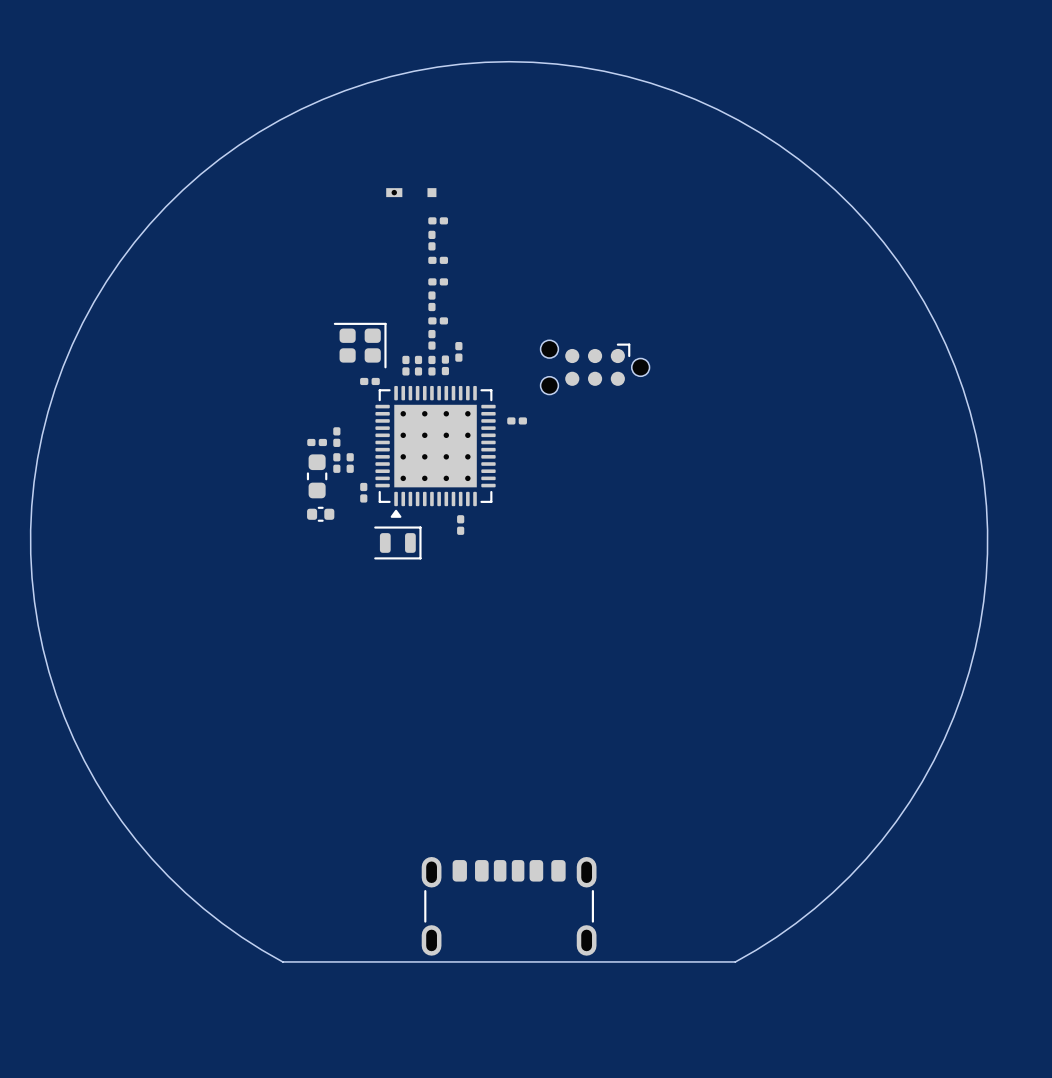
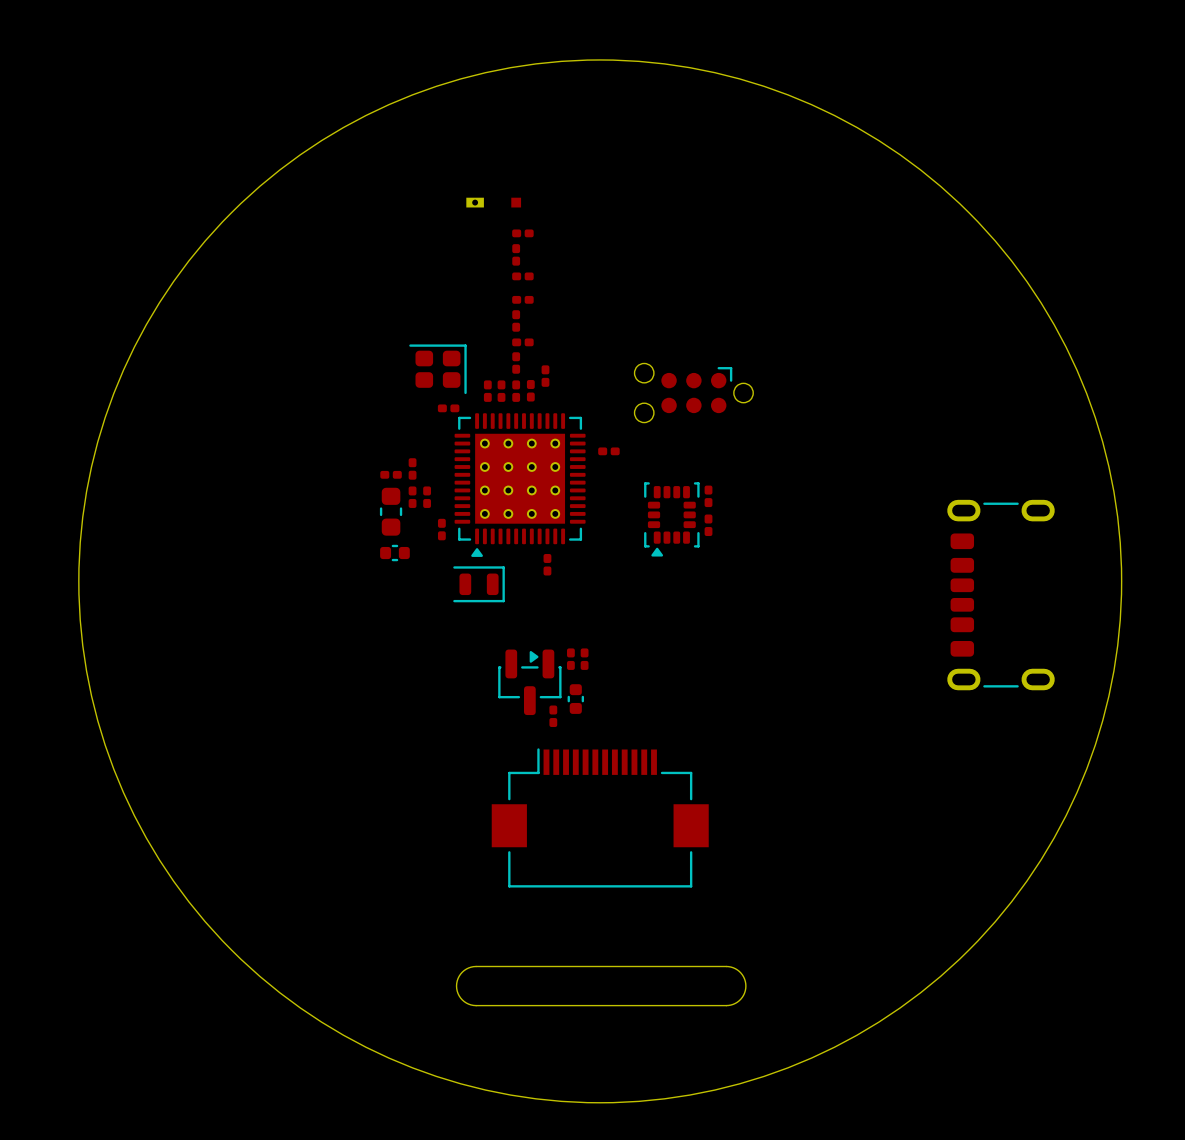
round board edge: none -> [78, 59, 1123, 1104]
part: none -> (708, 496)
part: none -> (671, 519)
part: none -> (708, 525)
part: none -> (1001, 595)
part: none -> (570, 659)
part: none -> (584, 659)
part: none -> (529, 682)
part: none -> (575, 699)
part: none -> (553, 716)
part: none -> (600, 817)
board edge: none -> (476, 966) (728, 966) (740, 973) (744, 979) (745, 988) (739, 1000) (728, 1005) (473, 1005) (460, 997) (456, 983) (462, 972) (476, 966)
part: (509, 906) -> none
board edge: (282, 961) (735, 961) (795, 923) (849, 876) (896, 821) (933, 760) (953, 717) (969, 671) (980, 625) (986, 577) (987, 530) (984, 482) (976, 435) (963, 389) (945, 344) (924, 302) (898, 261) (868, 224) (817, 174) (779, 145) (738, 120) (695, 99) (650, 83) (604, 71) (556, 64) (485, 62) (437, 67) (390, 76) (345, 90) (301, 109) (259, 132) (219, 159) (182, 190) (149, 224) (119, 261) (94, 302) (72, 344) (55, 389) (42, 435) (34, 482) (30, 530) (32, 577) (38, 625) (48, 671) (64, 717) (84, 760) (108, 801) (136, 840) (168, 876) (203, 908) (241, 937) (282, 961) -> none

